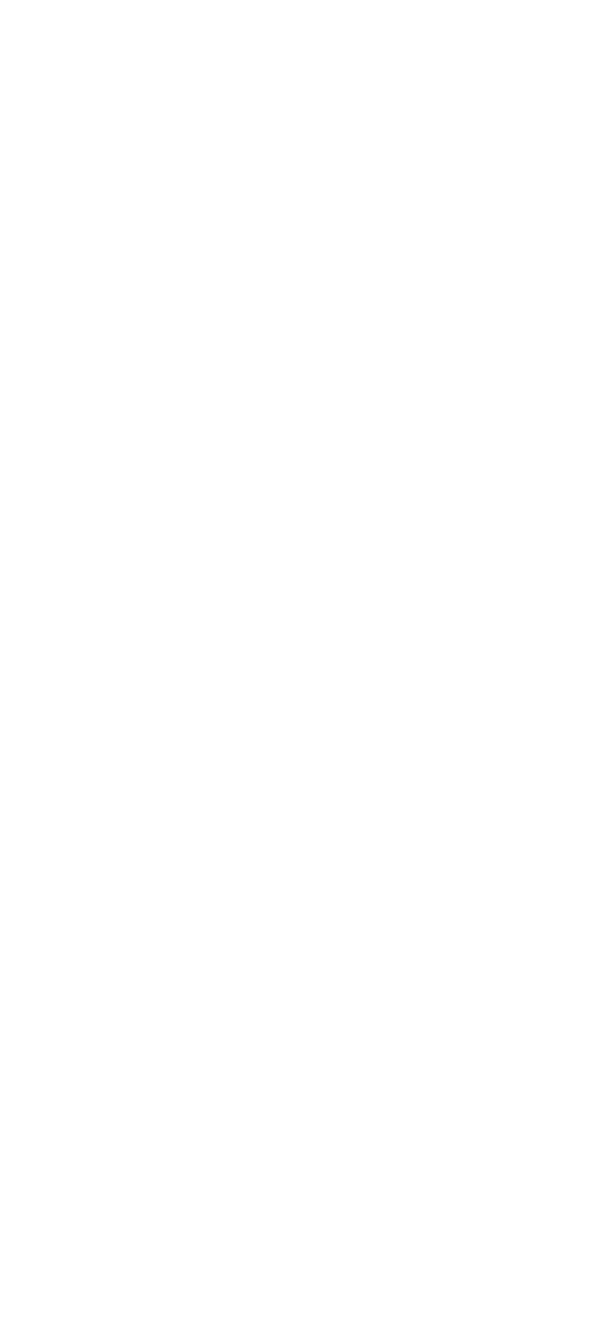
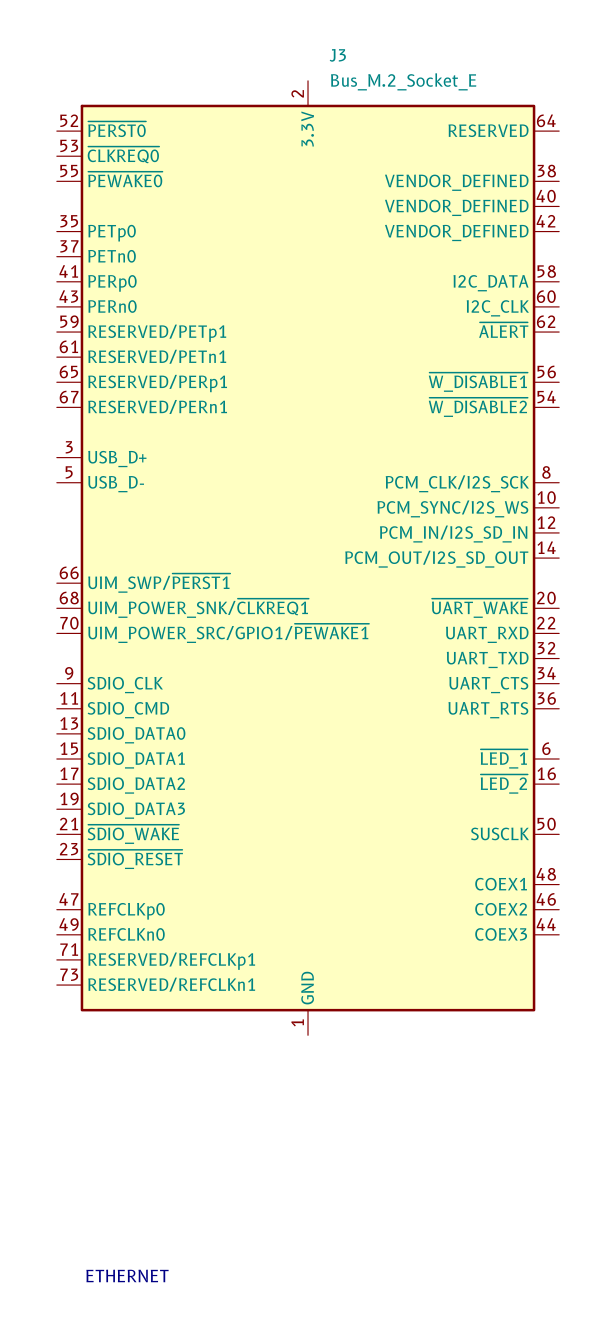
J3: none -> Bus_M.2_Socket_E (308, 558)
text: none -> ETHERNET (127, 1275)

